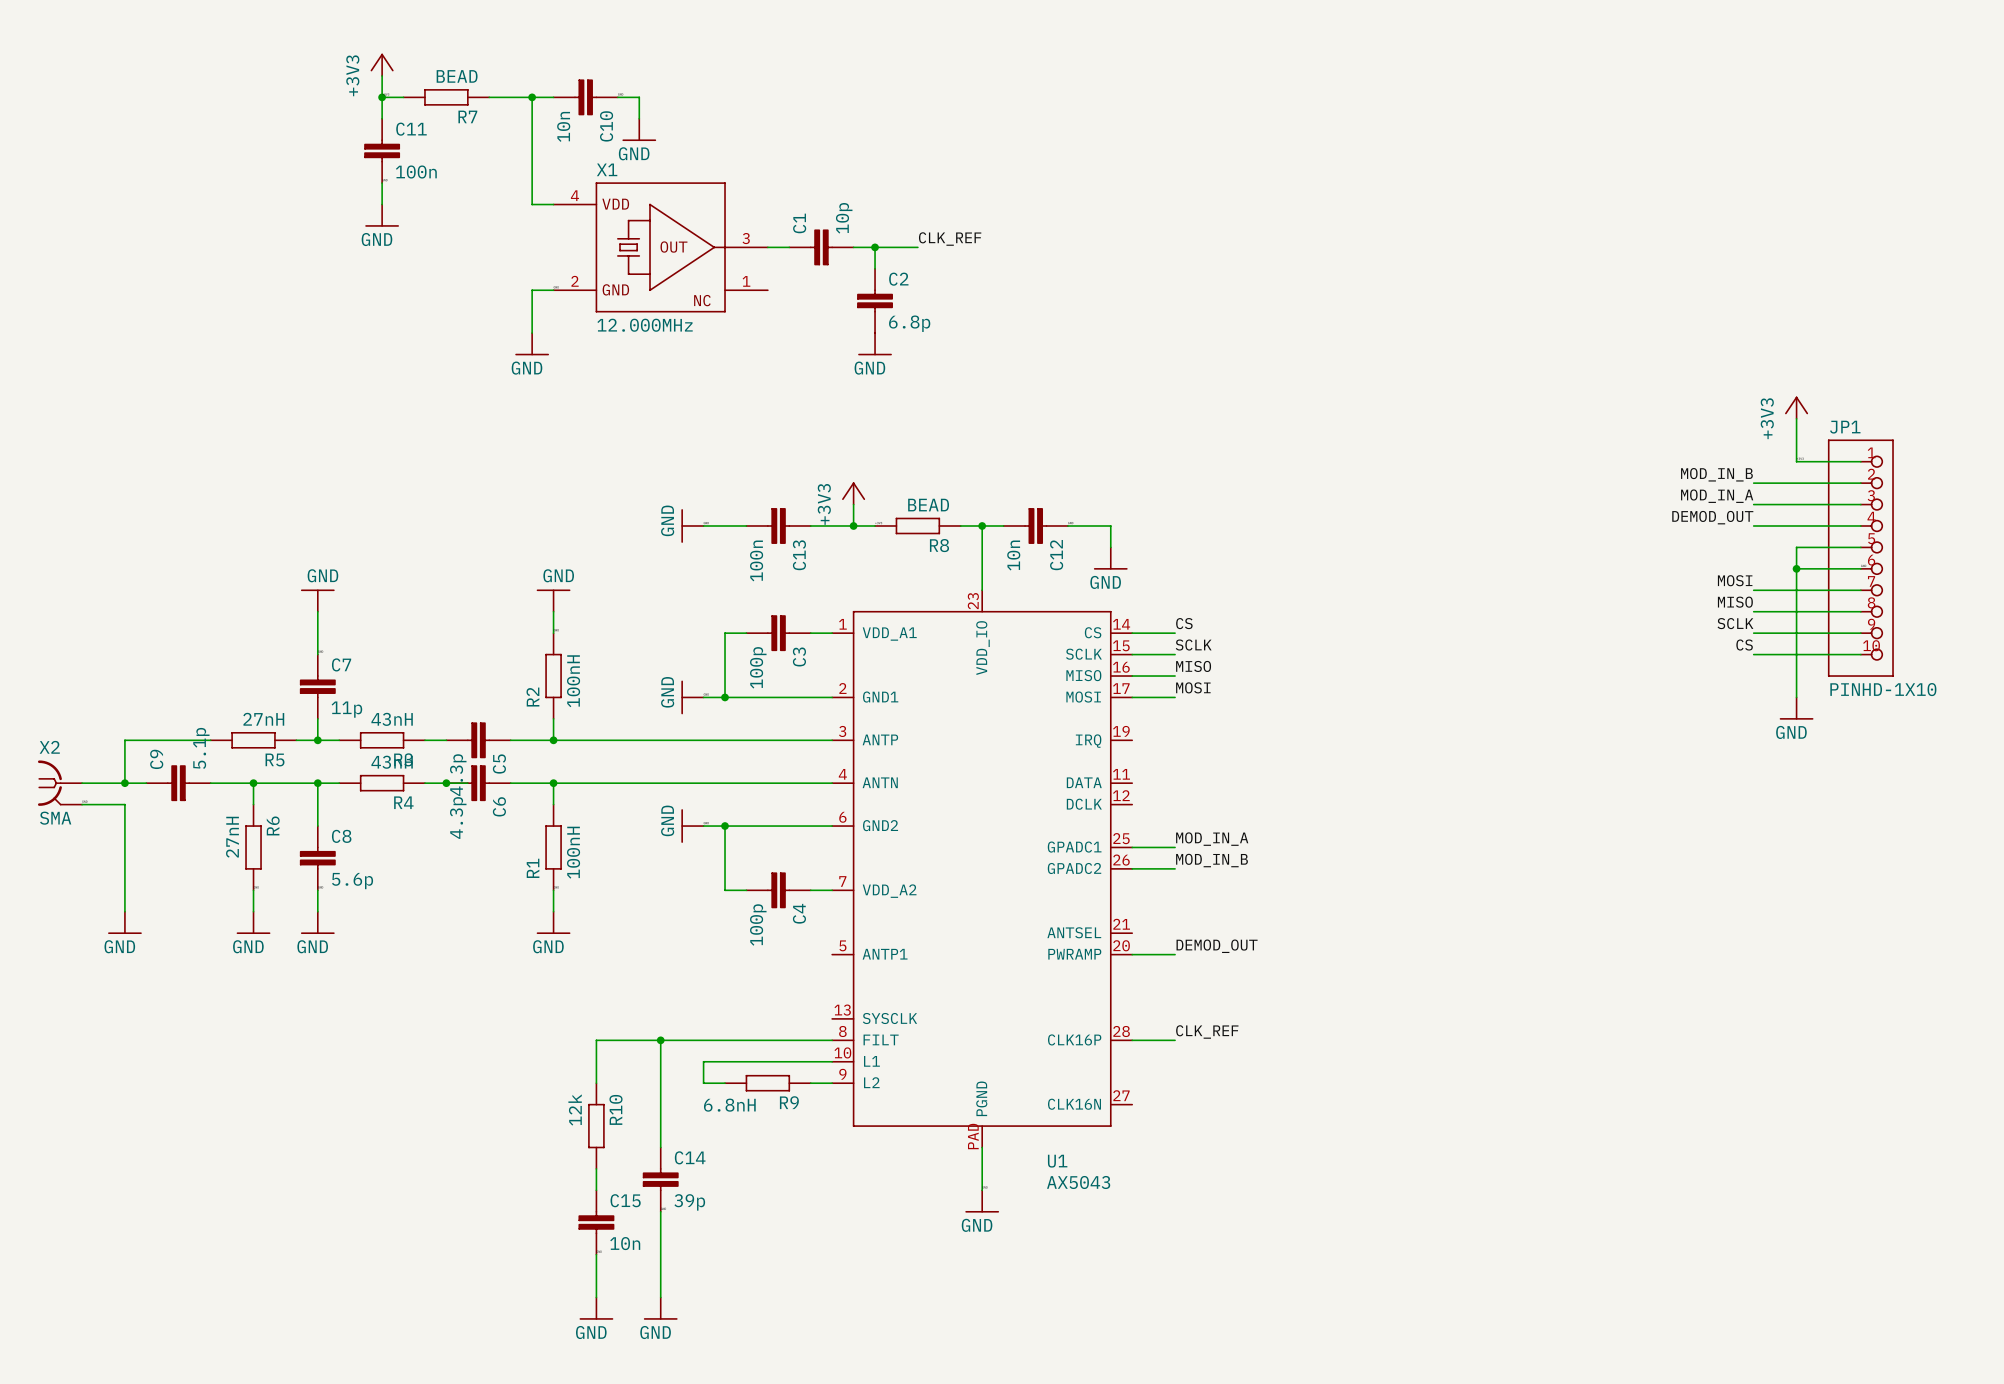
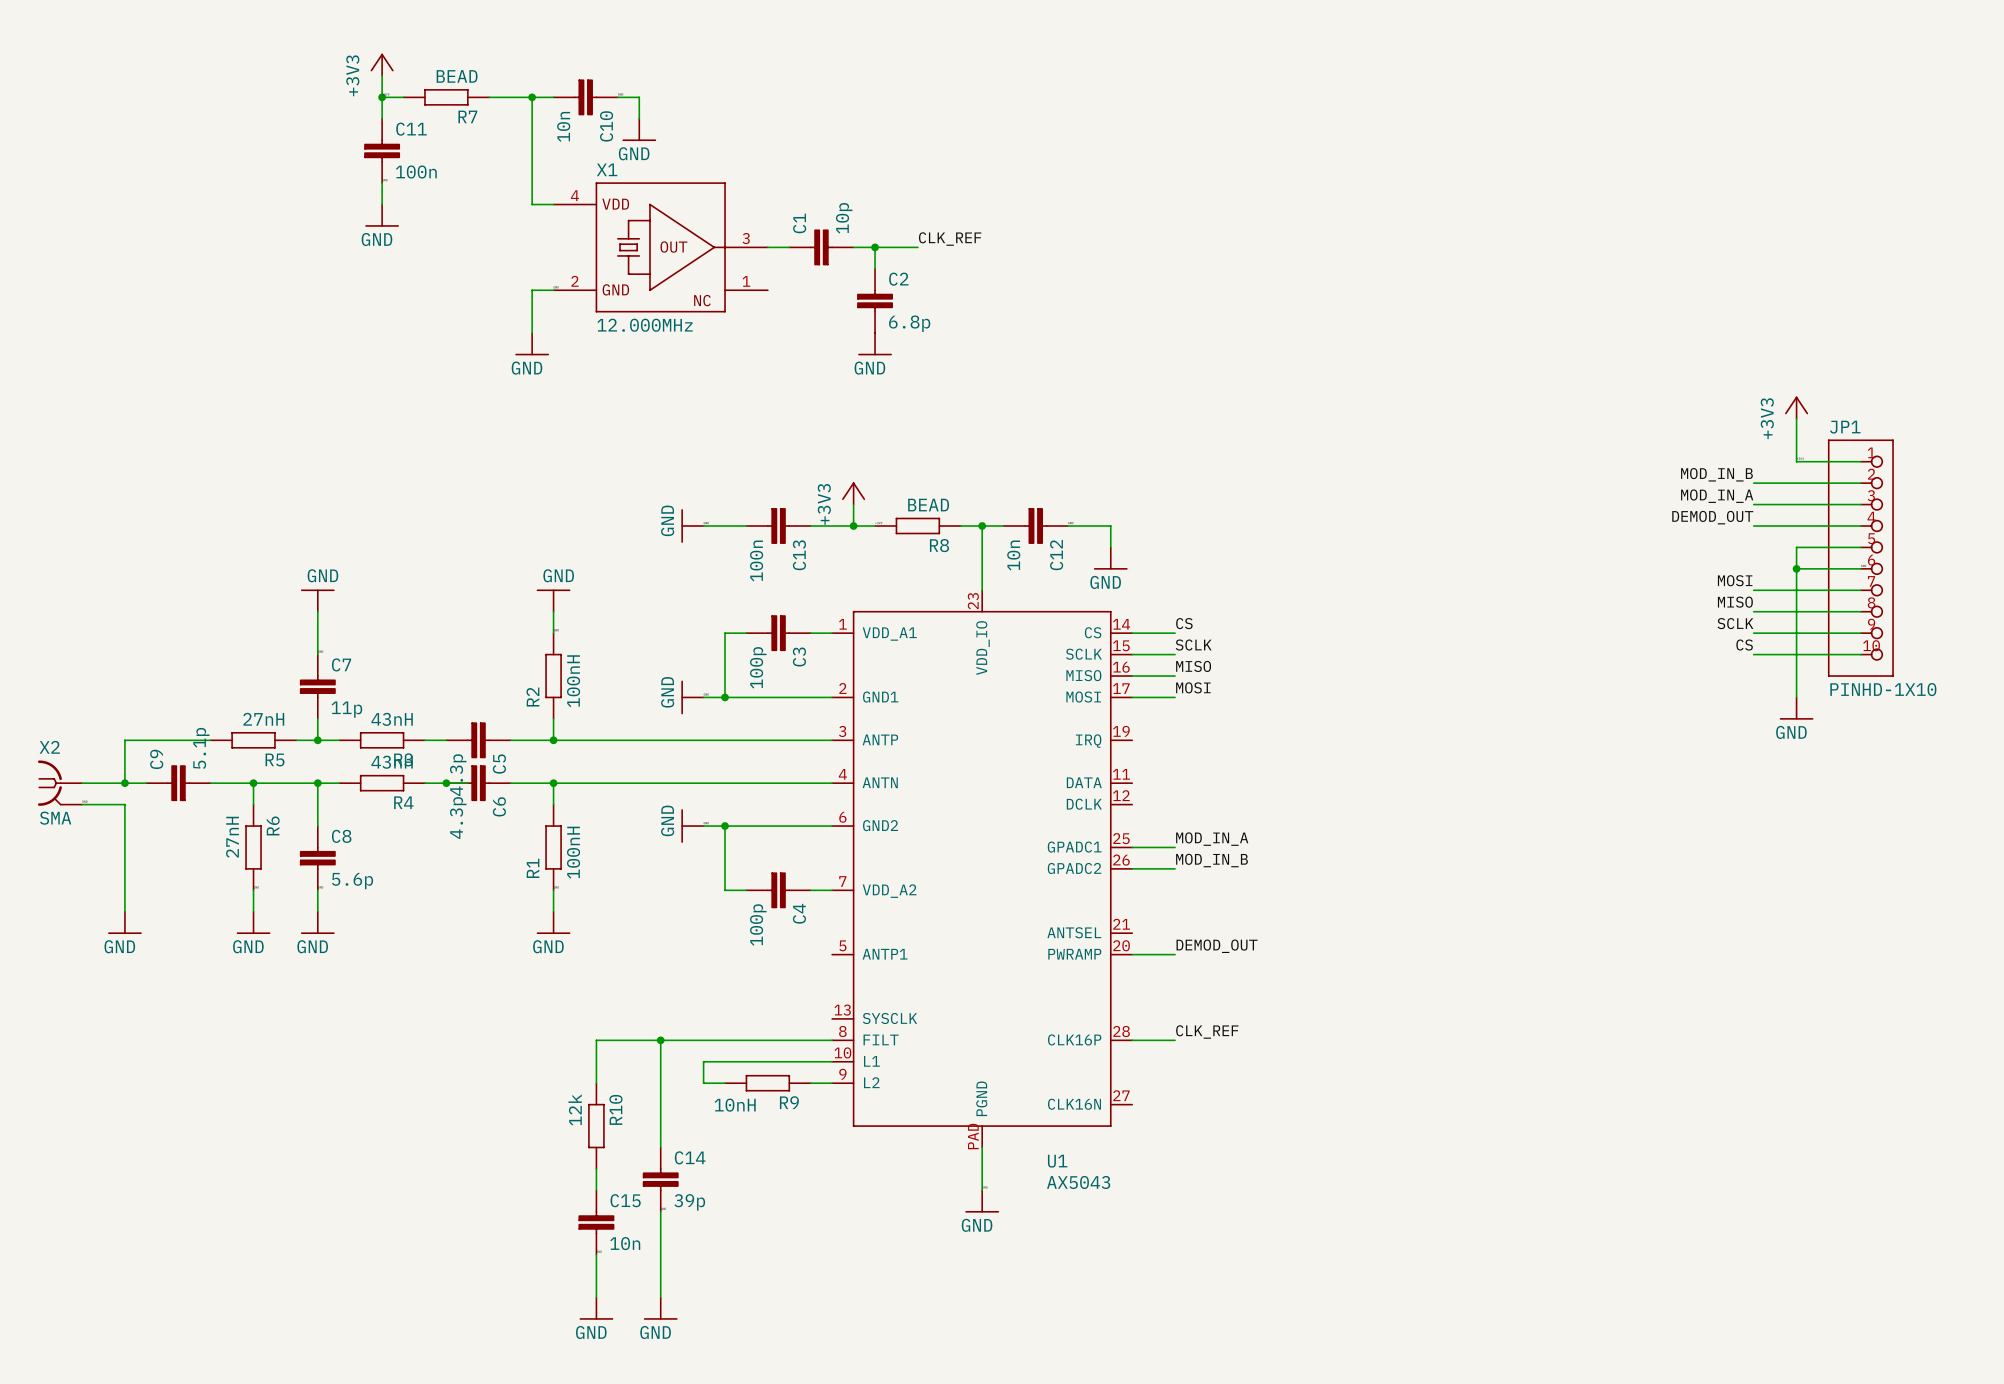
R9 value: 6.8nH (729, 1105) -> 10nH (735, 1105)

